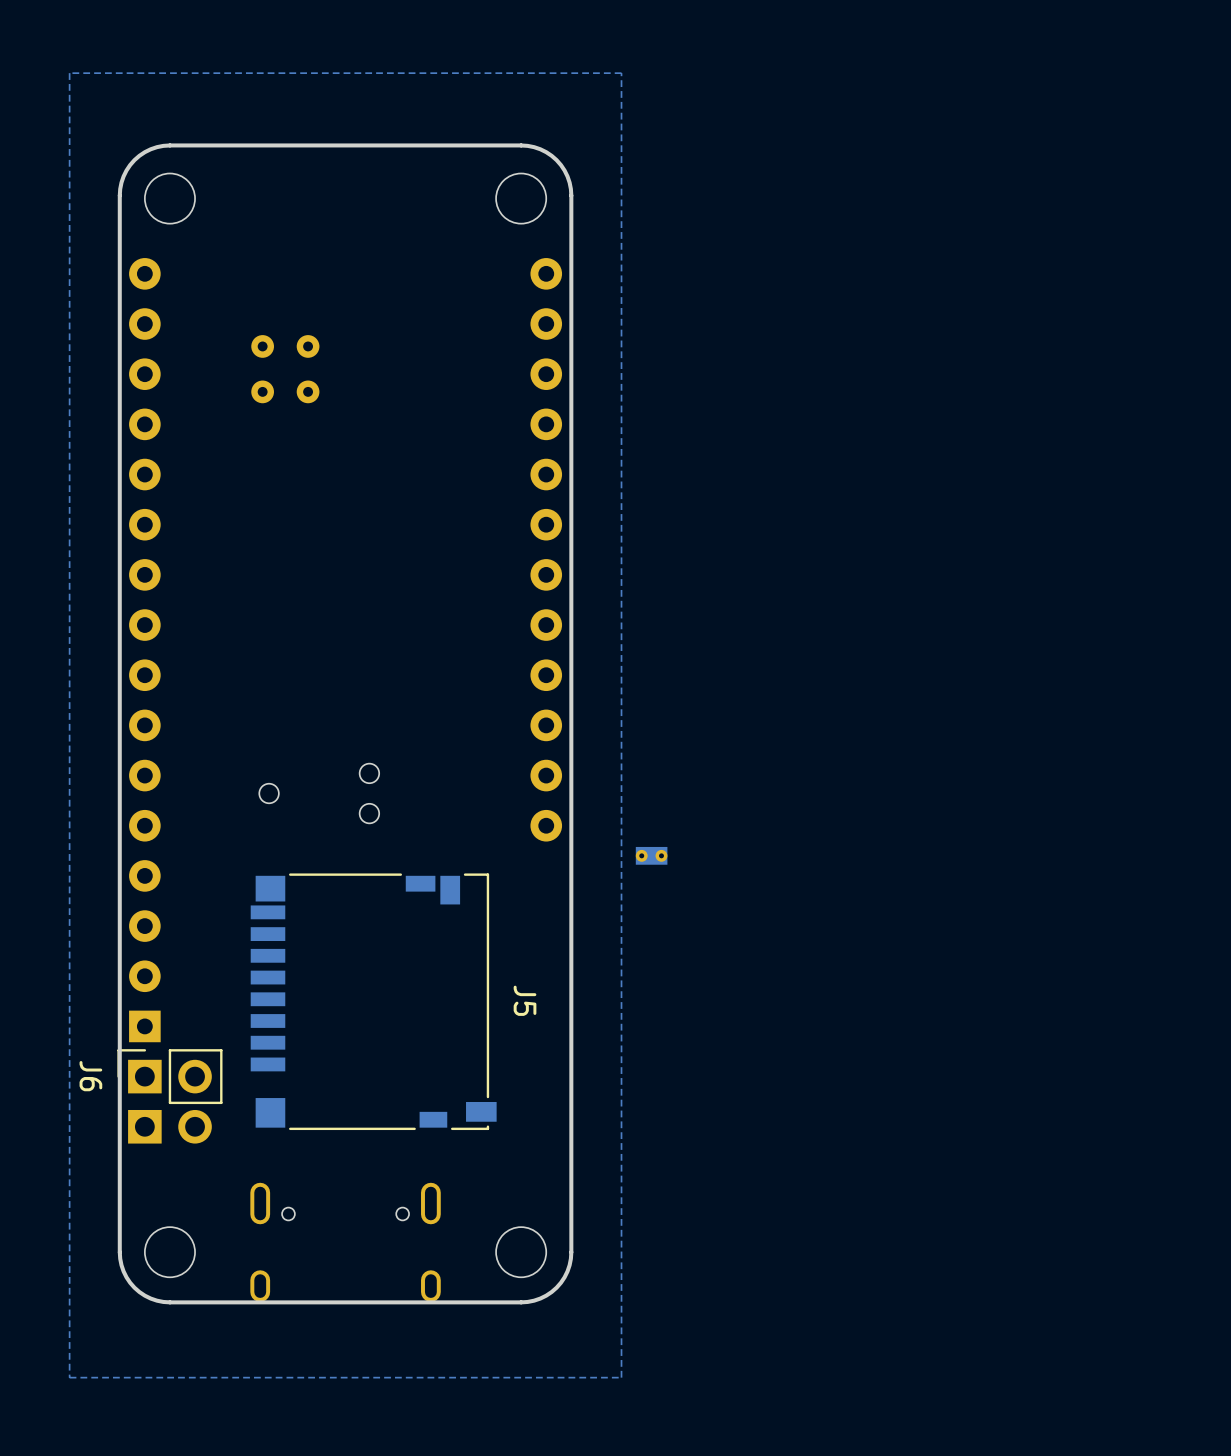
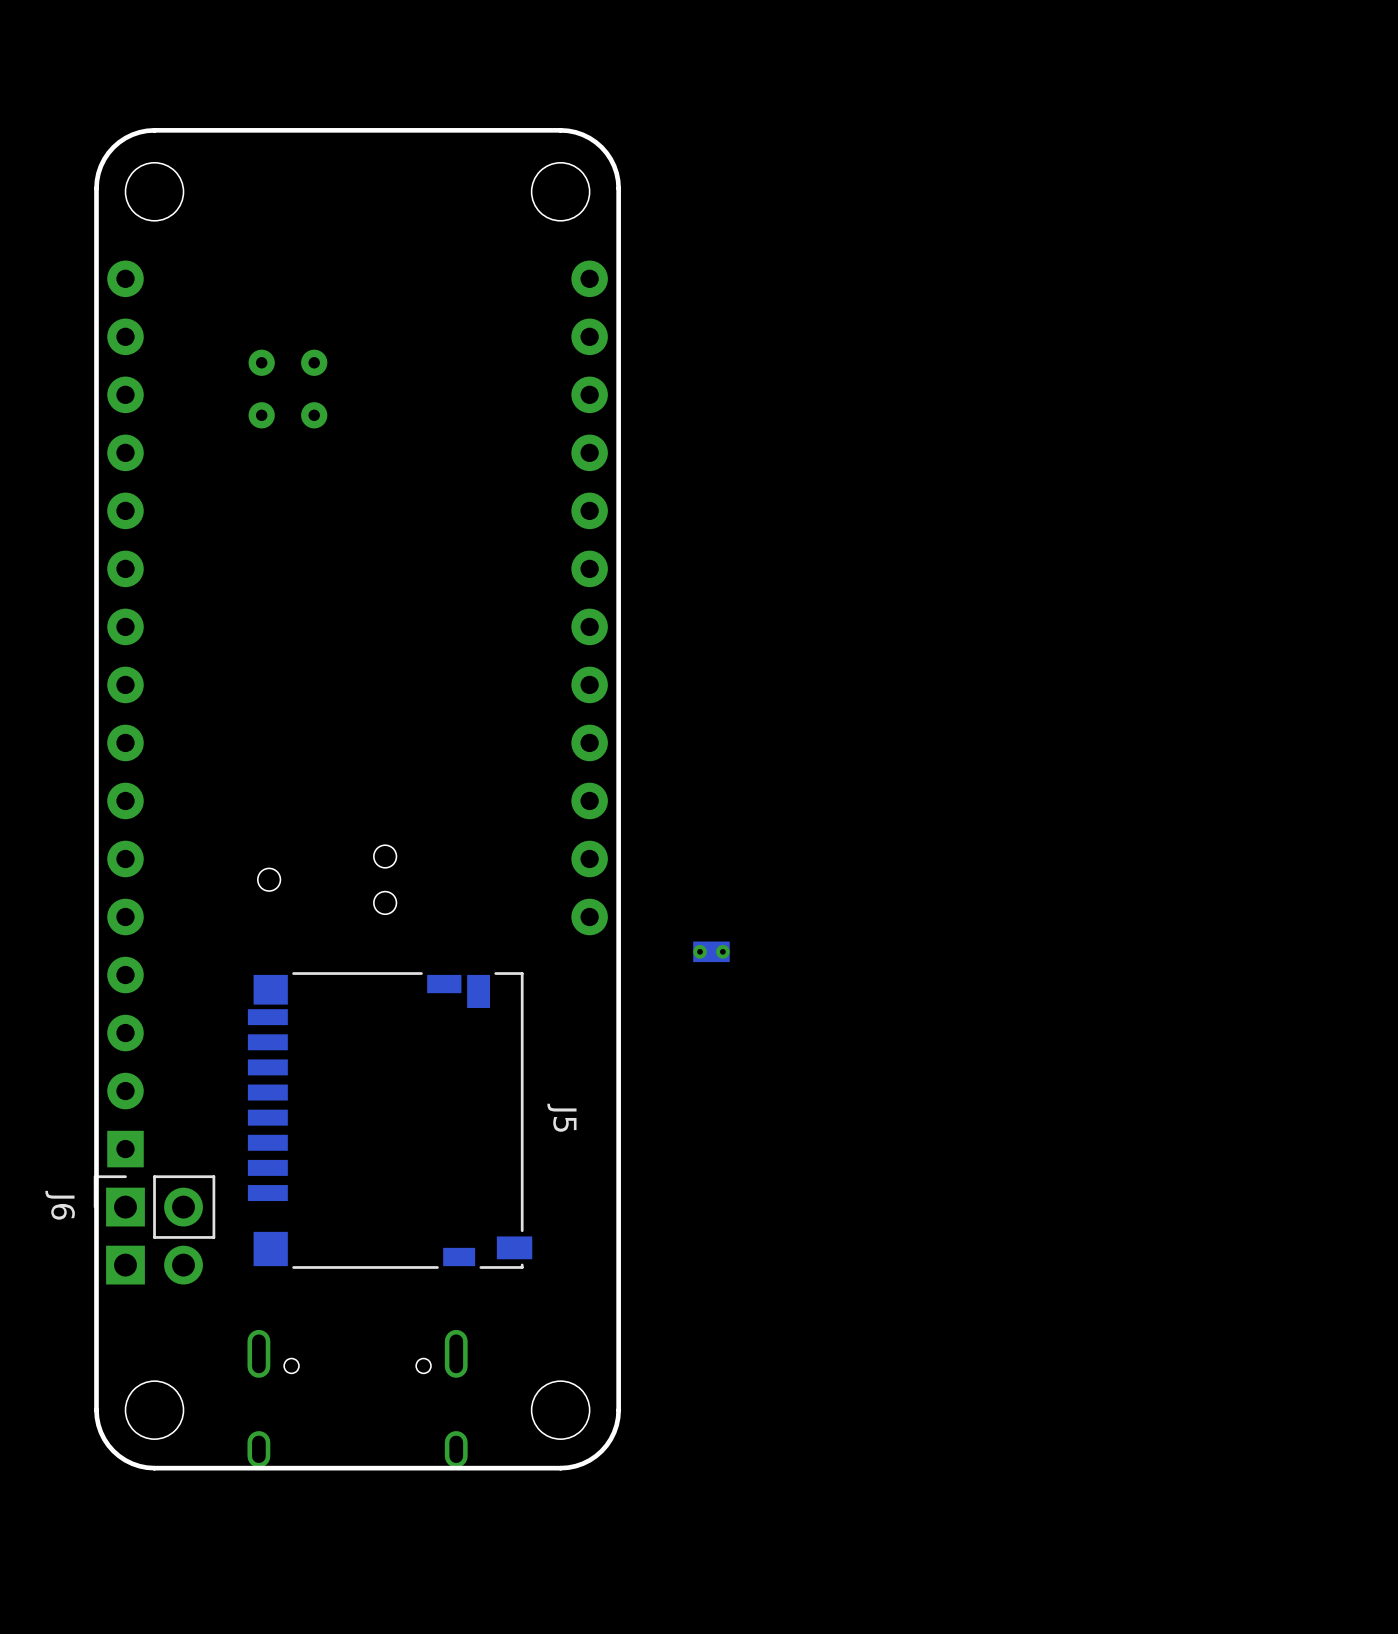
zone outline: (621, 73) (69, 73) (69, 1377) (621, 1377) (621, 73) -> none

